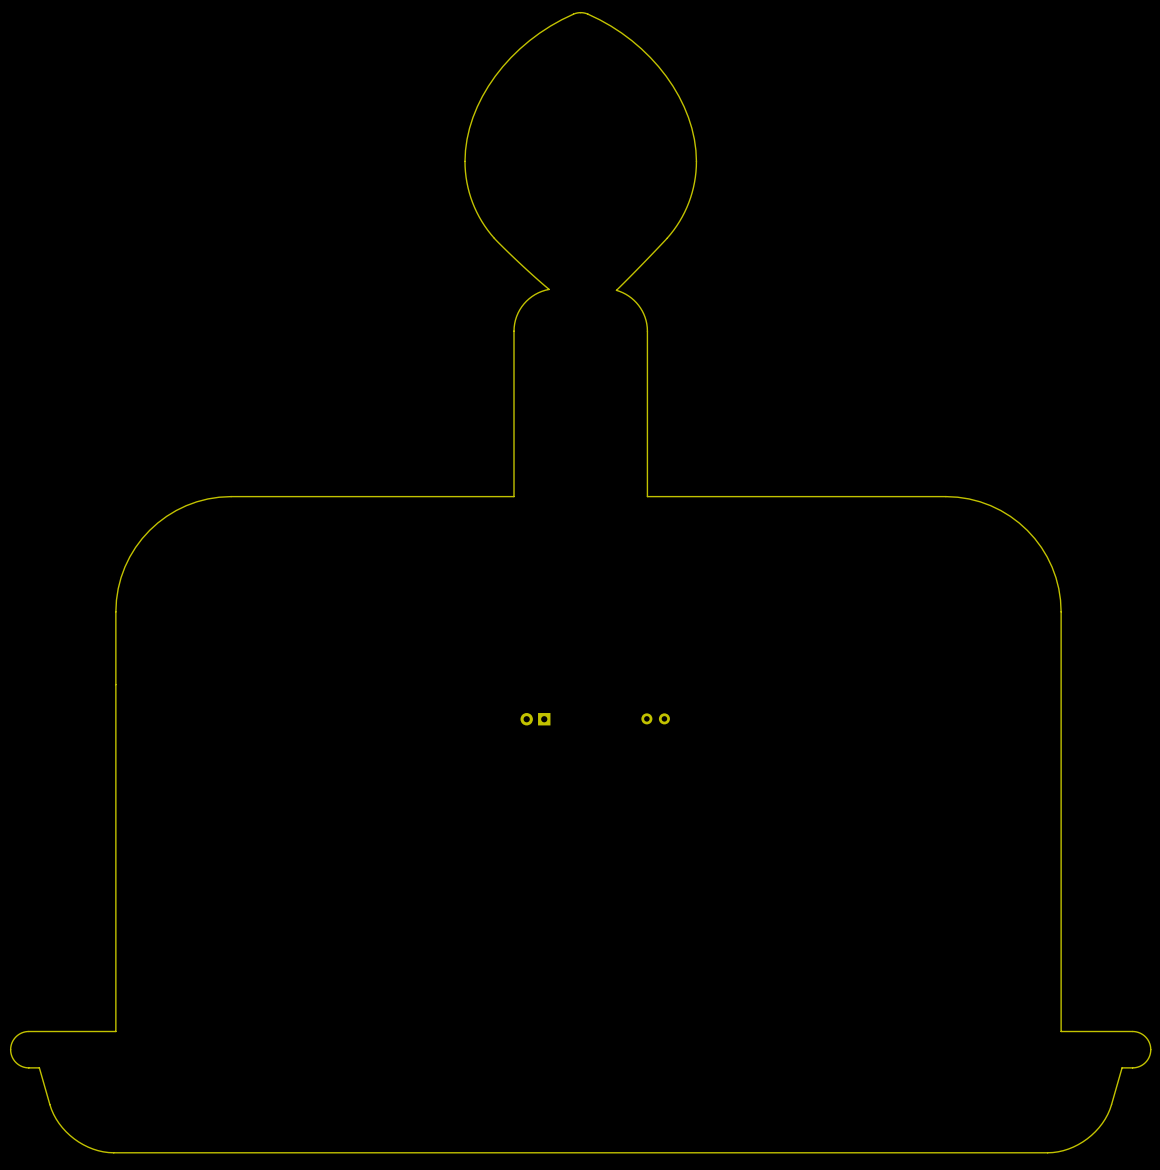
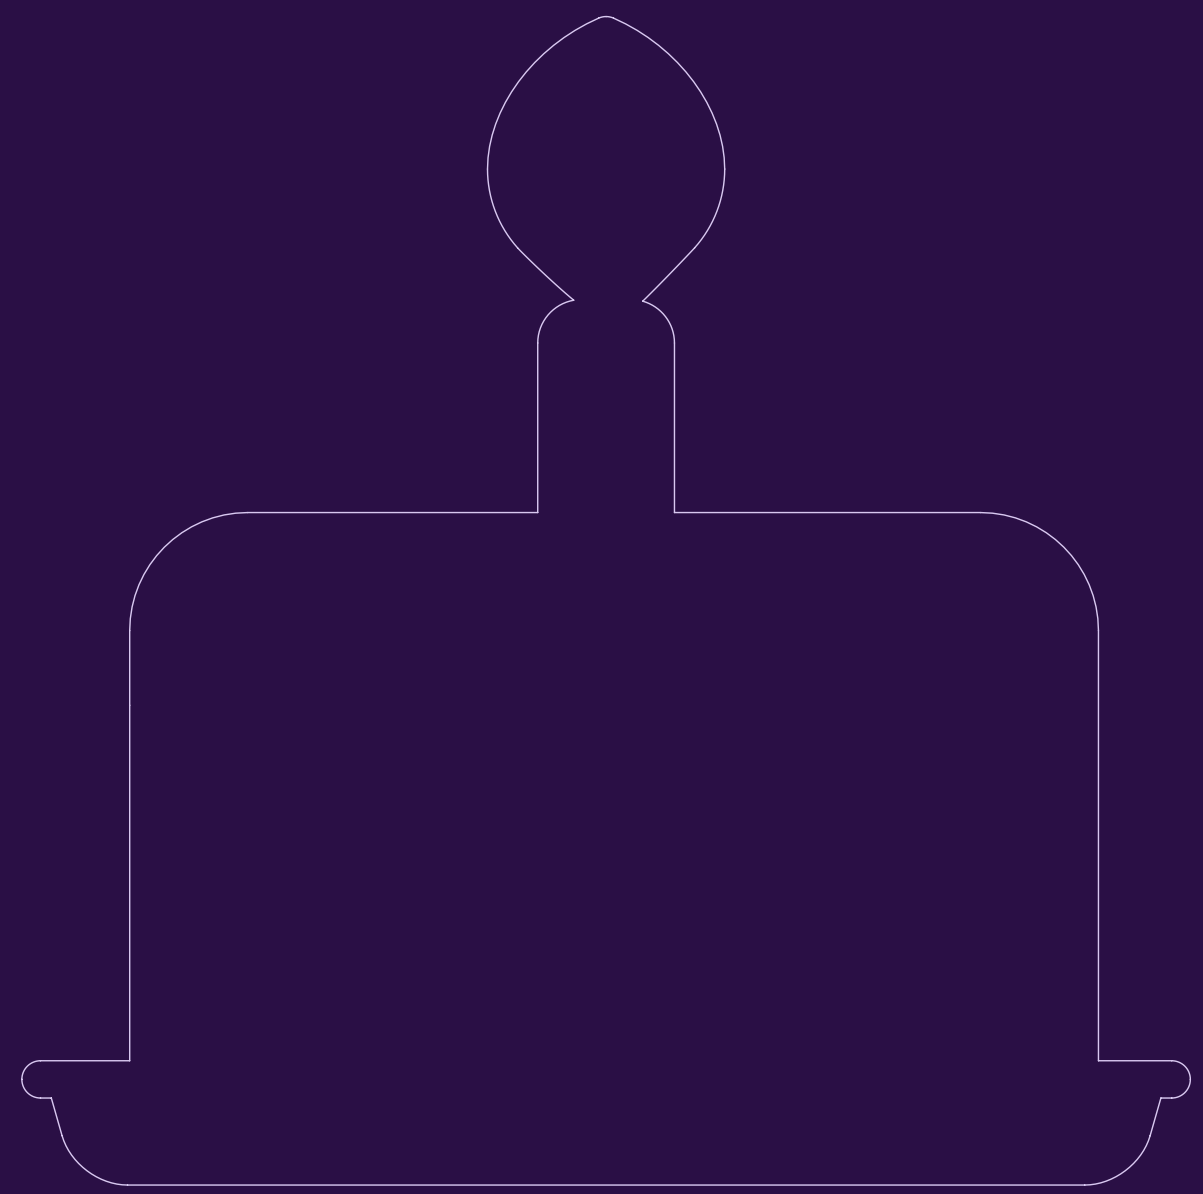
part: (655, 718) -> none
part: (535, 719) -> none

